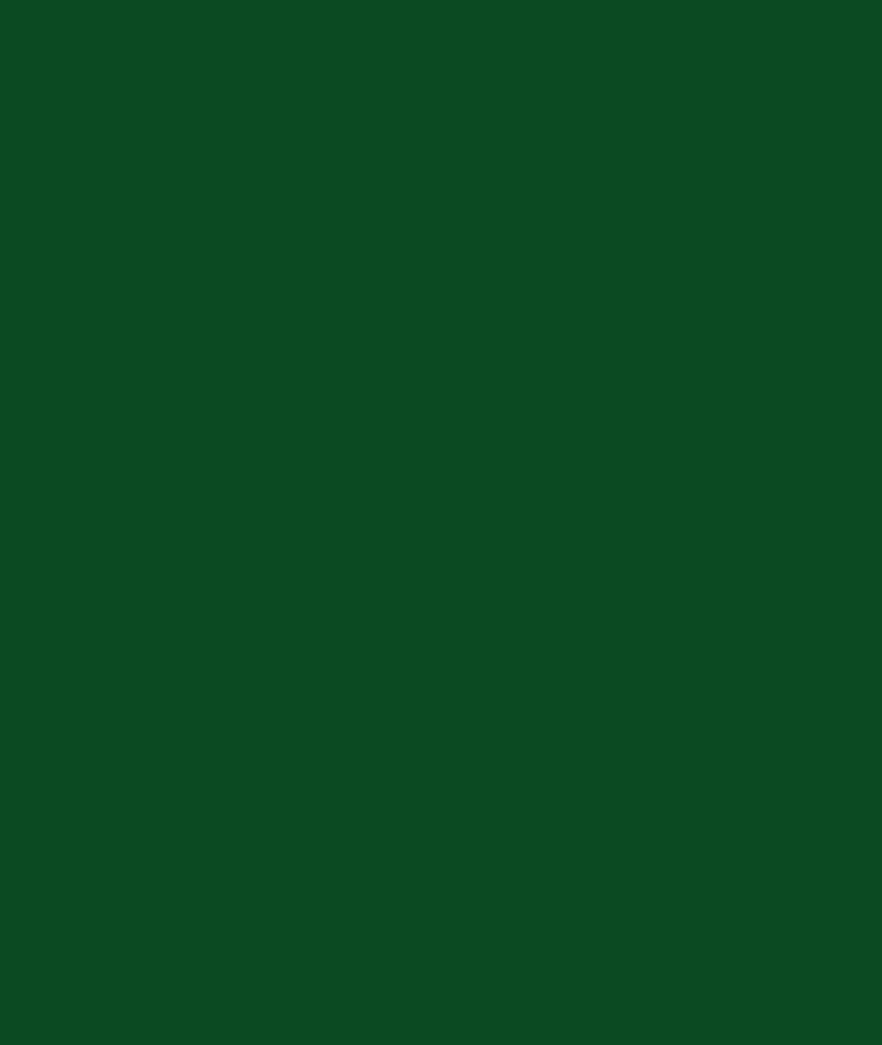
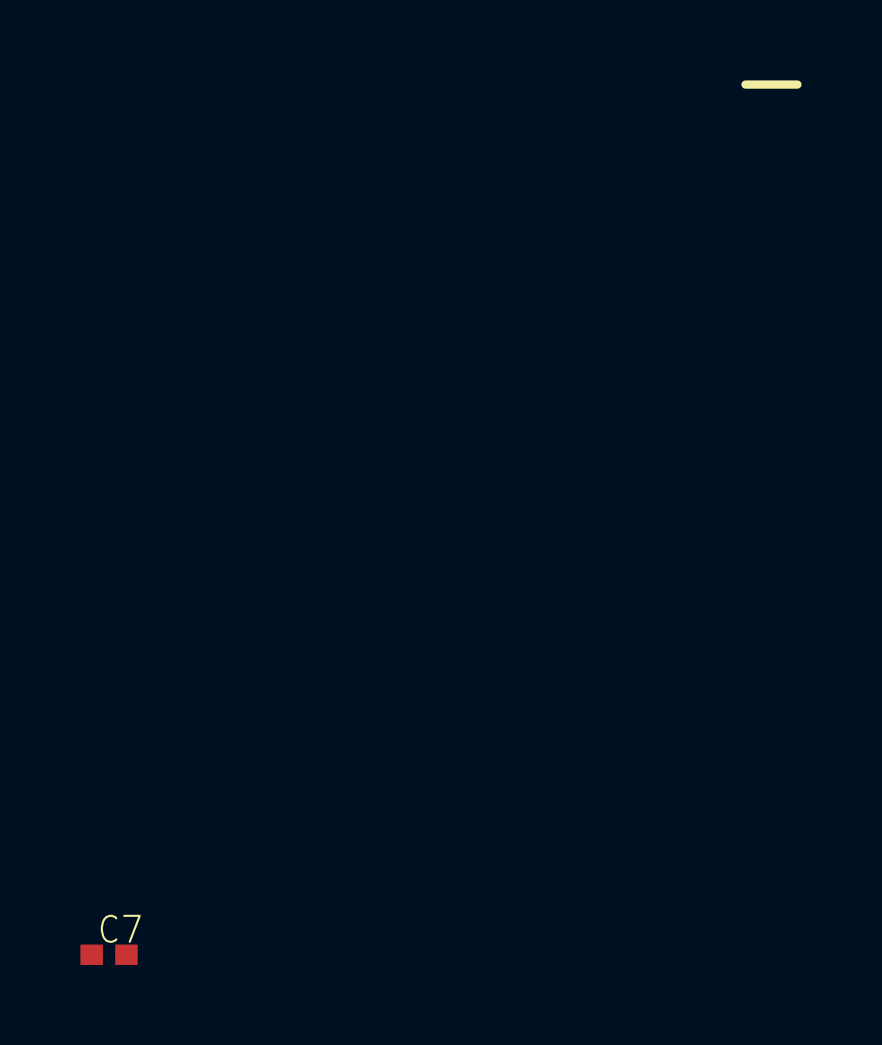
line: none -> (745, 84) (797, 84)
C7: none -> (109, 954)

